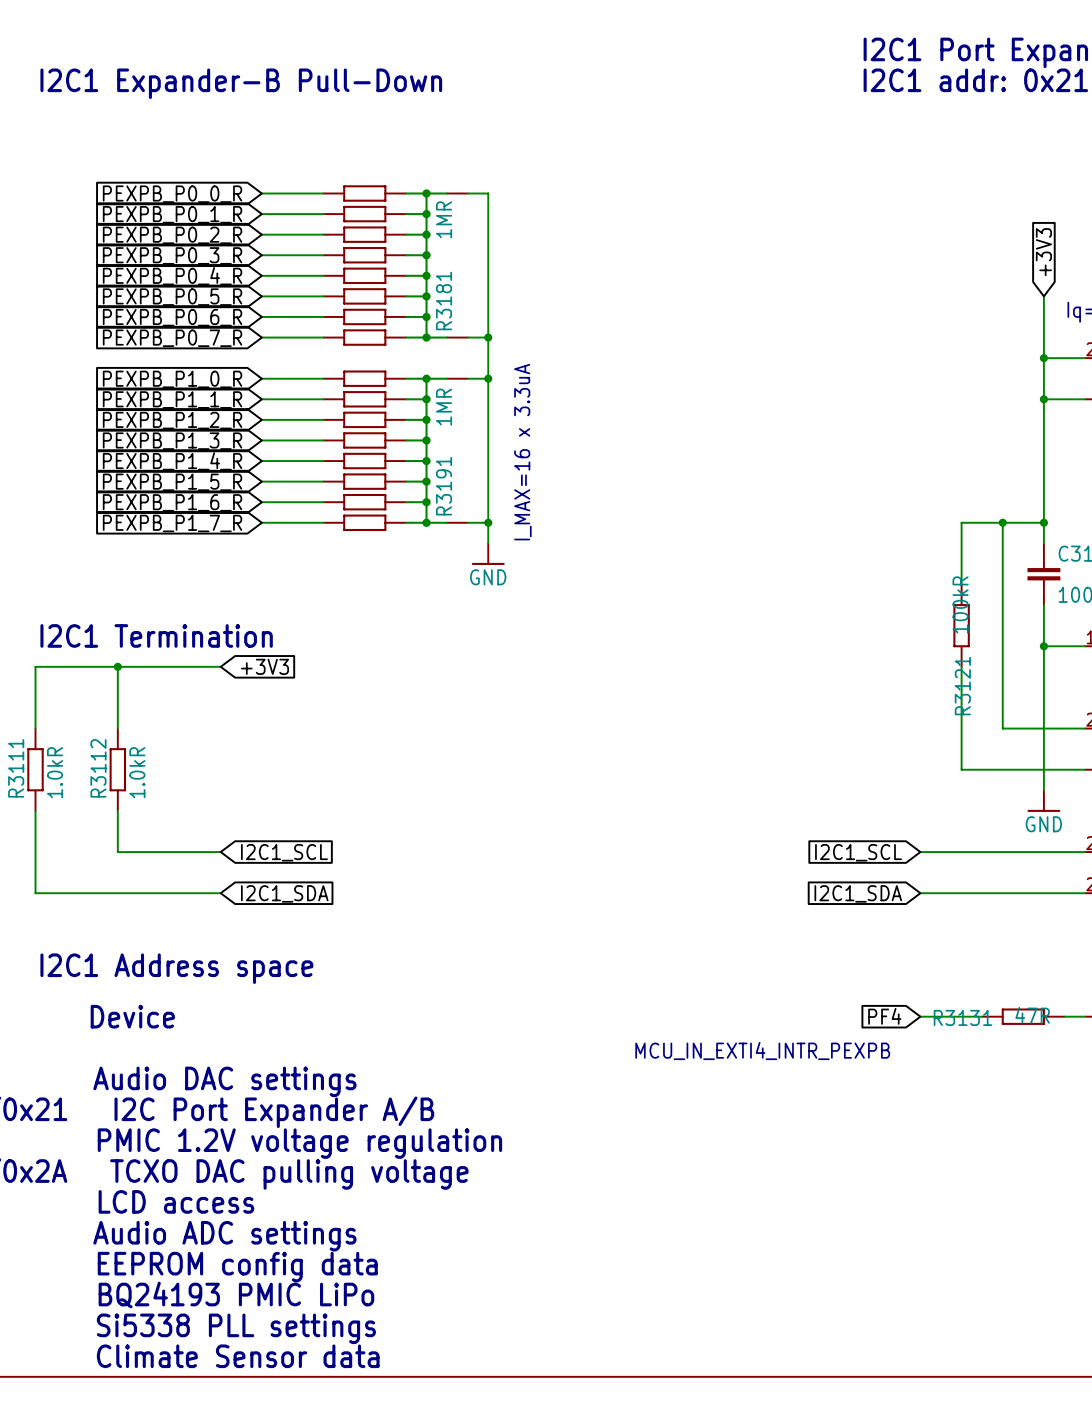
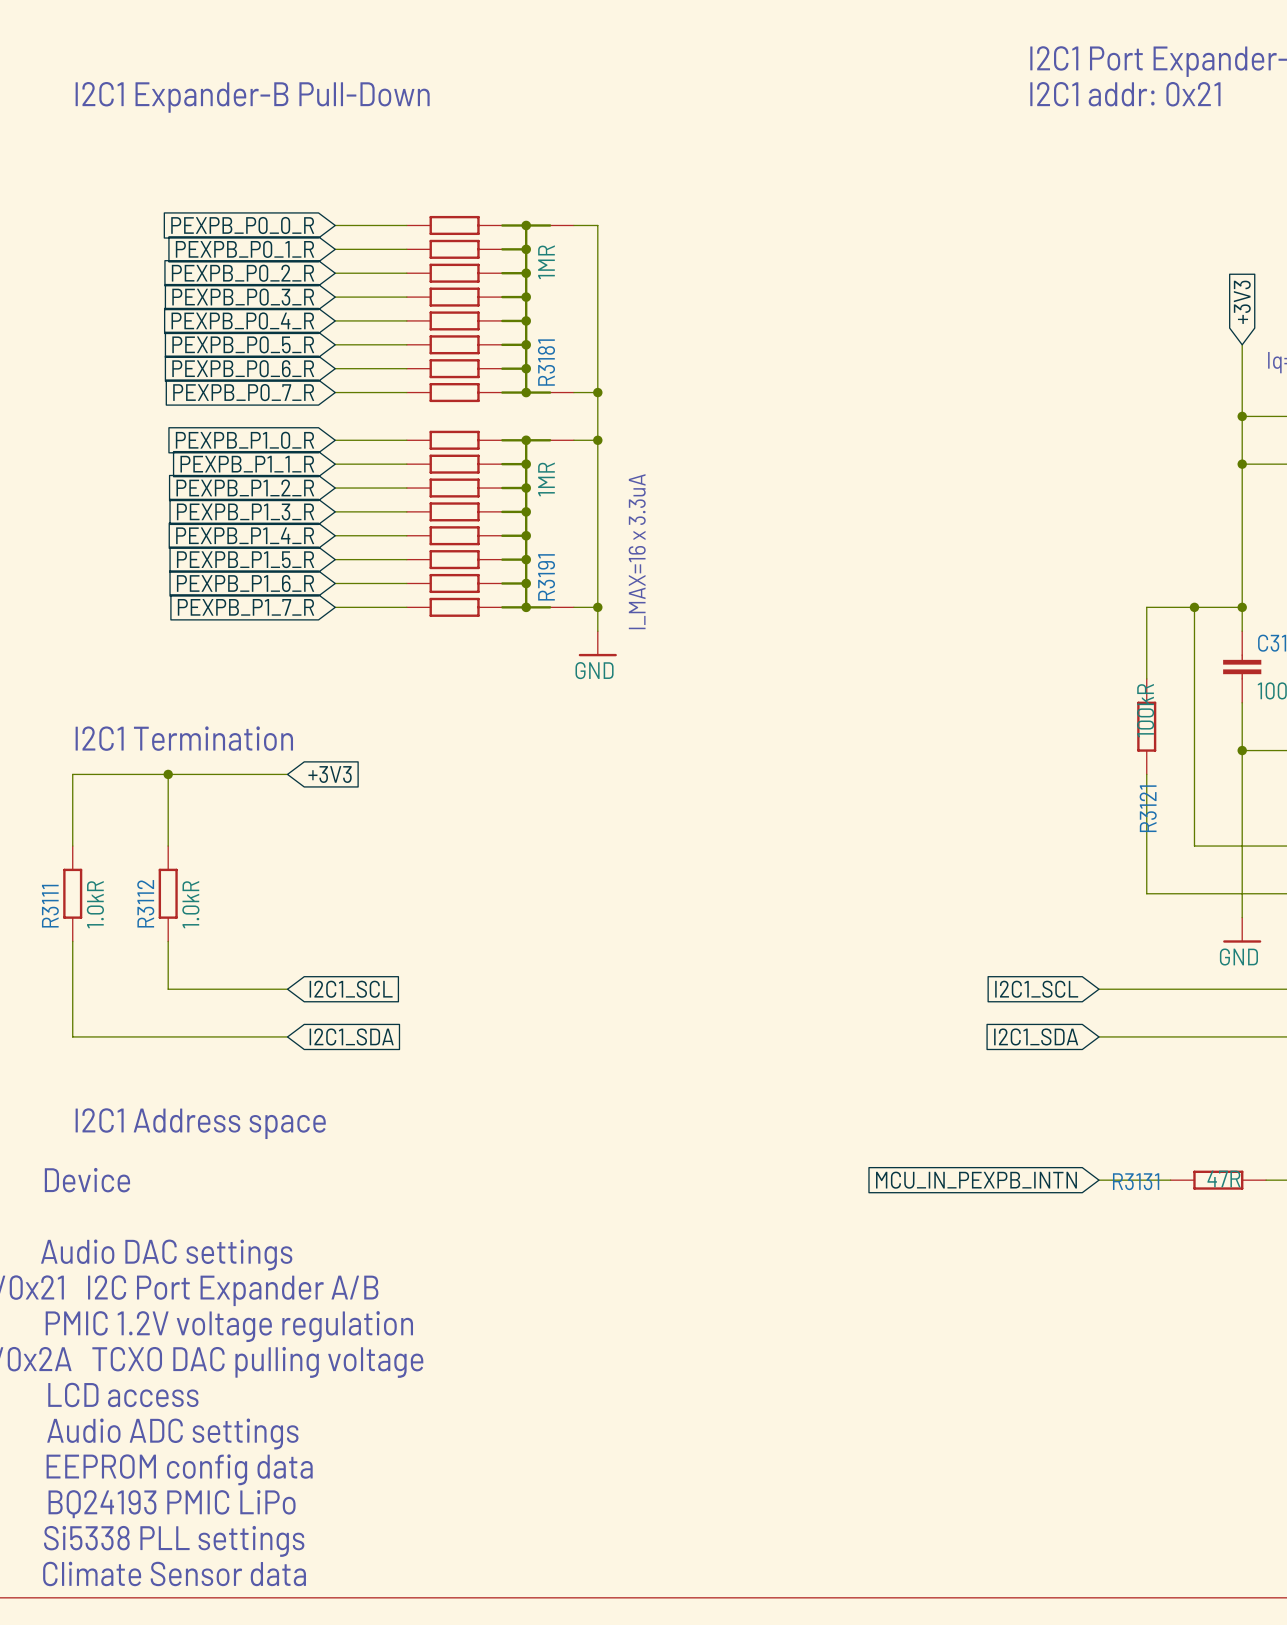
global label: PF4 (884, 1016) -> MCU_IN_PEXPB_INTN (976, 1180)
text: MCU_IN_EXTI4_INTR_PEXPB (762, 1050) -> none

